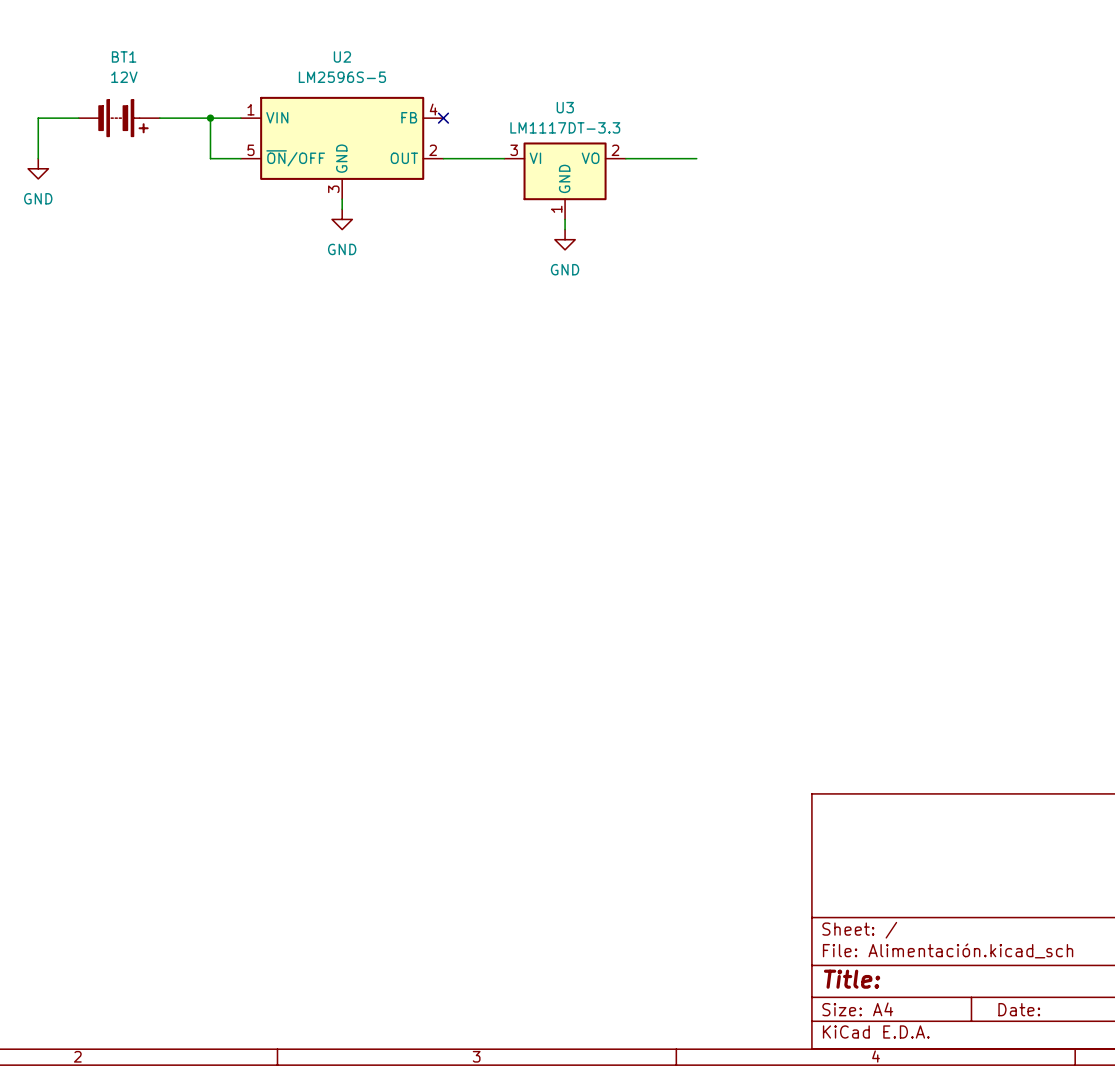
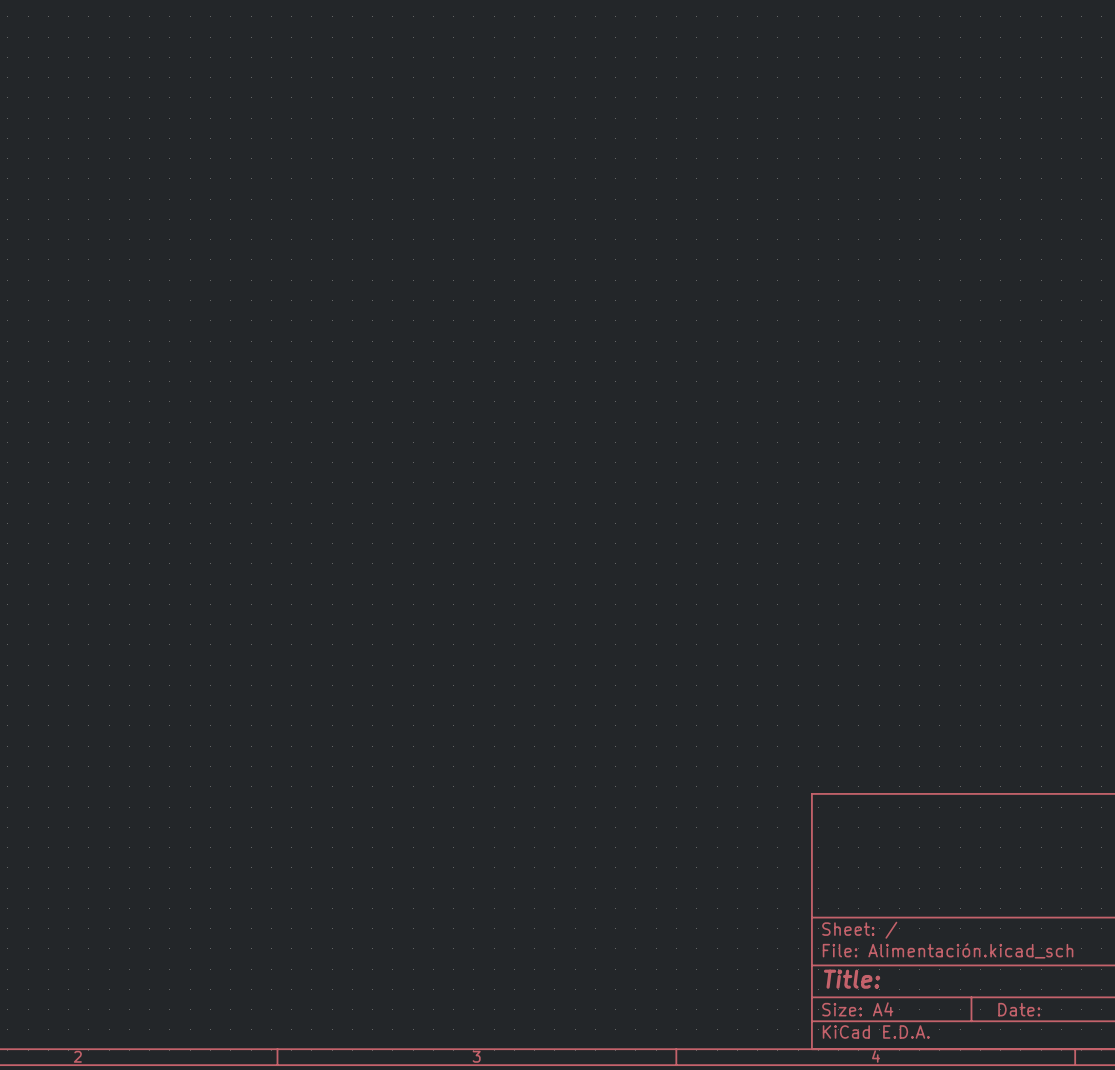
wire: (78, 118) (38, 118) (38, 158) -> none
BT1: 12V (119, 118) -> none
wire: (159, 118) (240, 118) -> none
wire: (210, 118) (210, 158) (240, 158) -> none
junction: (210, 118) -> none
no-connect mark: (443, 118) -> none
U2: LM2596S-5 (342, 148) -> none
wire: (443, 158) (504, 158) -> none
wire: (625, 158) (696, 158) -> none
power symbol: GND (38, 168) -> none
U3: LM1117DT-3.3 (565, 180) -> none
wire: (342, 199) (342, 209) -> none
power symbol: GND (342, 219) -> none
wire: (565, 219) (565, 229) -> none
power symbol: GND (565, 239) -> none

